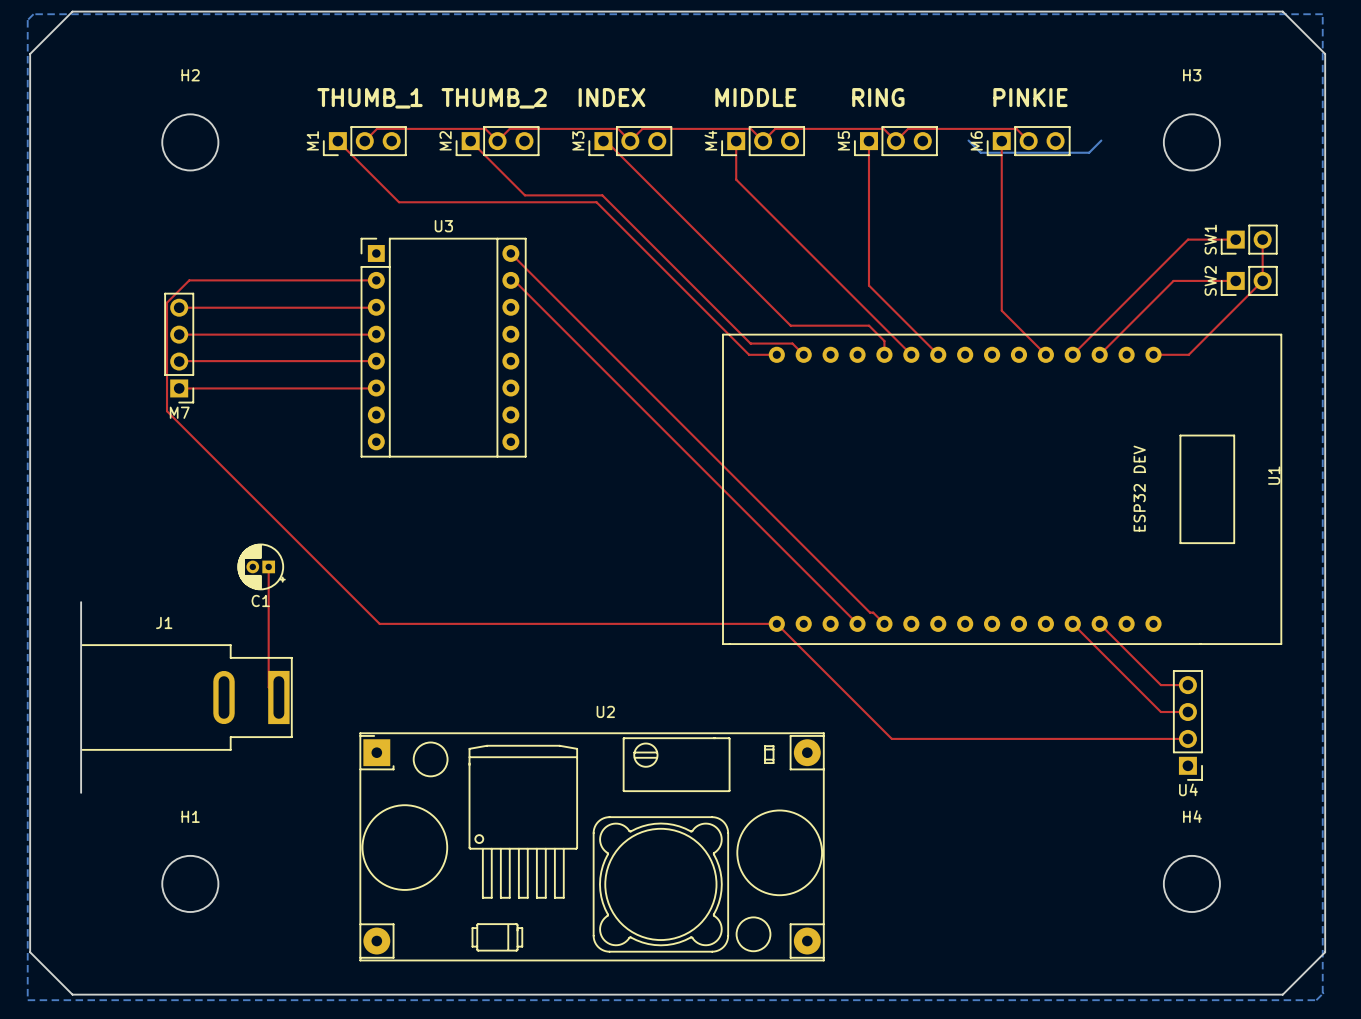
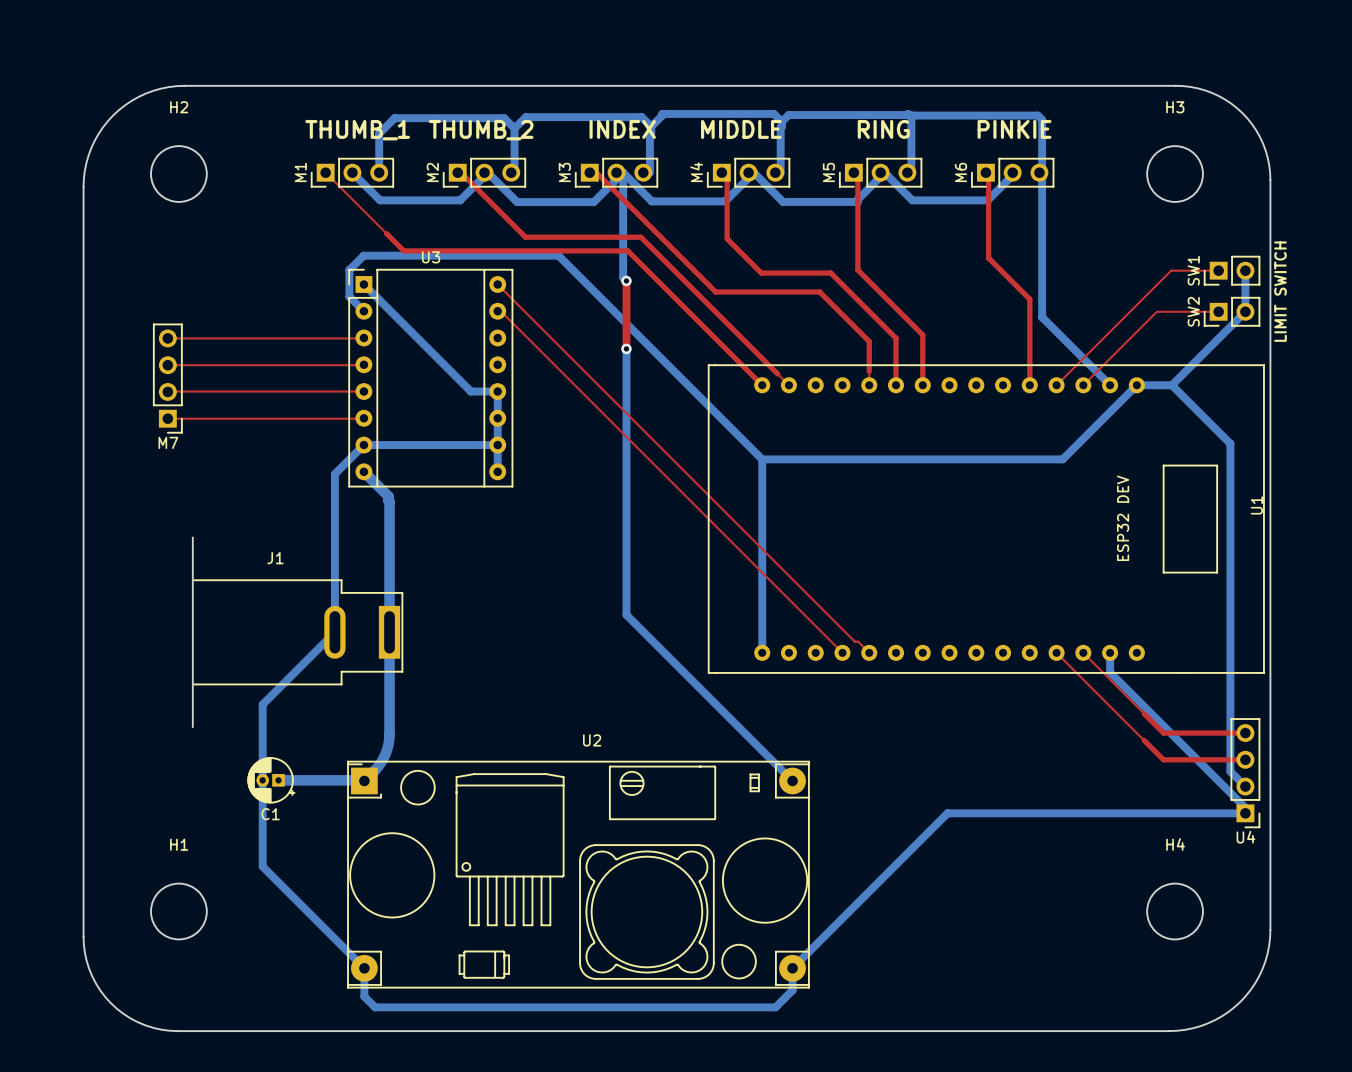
board edge: (72, 11) (1282, 11) (1325, 53) (1325, 952) (1282, 994) (72, 994) (30, 952) (30, 53) (72, 11) -> (1169, 1031) (1200, 1026) (1222, 1016) (1234, 1006) (1251, 989) (1259, 975) (1267, 953) (1270, 937) (1270, 172) (1265, 150) (1260, 137) (1252, 124) (1237, 108) (1218, 95) (1204, 90) (1175, 85) (184, 85) (161, 88) (138, 96) (125, 105) (107, 121) (98, 134) (88, 155) (83, 186) (83, 936) (86, 961) (92, 976) (105, 997) (117, 1009) (145, 1025) (177, 1031) (1169, 1031)
bottom track: none -> (911, 117) (908, 113) (788, 115) (781, 121)
bottom track: none -> (911, 117) (911, 172)
bottom track: none -> (911, 117) (912, 115) (1037, 115) (1042, 119) (1042, 317) (1110, 385)
bottom track: none -> (781, 121) (773, 113) (662, 113) (651, 126)
bottom track: none -> (781, 121) (780, 172)
bottom track: none -> (651, 126) (649, 172)
bottom track: none -> (651, 126) (641, 117) (525, 117) (514, 128) (514, 172)
bottom track: none -> (514, 128) (504, 118) (394, 118) (379, 133) (379, 172)
text position: INDEX (611, 97) -> INDEX (622, 129)
text position: RING (878, 97) -> RING (883, 129)
bottom track: (968, 140) (980, 152) (1089, 152) (1101, 140) -> none
top track: (364, 141) (376, 128) (485, 128) (497, 141) (509, 128) (618, 128) (630, 141) (642, 128) (750, 128) (763, 141) (775, 128) (883, 128) (895, 141) (908, 128) (1016, 128) (1028, 141) -> none
bottom track: none -> (352, 172) (380, 200) (460, 200) (487, 172) (517, 202) (593, 202) (623, 172)
top track: (470, 141) (524, 195) (602, 195) (750, 343) -> none
top track: (603, 141) (606, 141) (790, 325) (869, 325) (884, 341) -> (596, 172) (715, 292) (819, 292) (869, 341) (869, 371)
bottom track: none -> (623, 172) (623, 277) (626, 280)
bottom track: none -> (623, 172) (651, 201) (725, 201) (753, 172) (783, 201) (857, 201) (857, 199) (884, 172) (912, 200) (987, 200) (1015, 172)
top track: (736, 141) (736, 179) (911, 354) -> (727, 172) (727, 238) (761, 273) (830, 273) (896, 338) (896, 385)
top track: (868, 141) (868, 285) (938, 354) -> (857, 172) (857, 269) (922, 334) (922, 385)
top track: (1001, 141) (1001, 310) (1045, 354) -> (988, 172) (988, 258) (1029, 299) (1029, 385)
top track: (399, 202) (596, 202) (749, 354) (776, 354) -> (386, 233) (403, 250) (627, 250) (762, 385)
top track: (1262, 239) (1262, 280) (1188, 354) (1153, 354) -> none
bottom track: none -> (1245, 270) (1245, 311) (1171, 385)
top track: none -> (626, 280) (626, 348)
via: none -> (626, 280)
bottom track: none -> (363, 284) (470, 391) (497, 391) (497, 471)
text: none -> LIMIT SWITCH (1280, 291)
top track: (376, 280) (189, 280) (167, 302) (167, 411) (379, 623) (776, 623) (891, 738) (1187, 738) -> none
bottom track: none -> (363, 311) (349, 296) (349, 270) (363, 255) (558, 255) (762, 459)
bottom track: none -> (626, 348) (626, 614) (792, 780)
via: none -> (626, 348)
top track: (750, 343) (792, 343) -> (461, 172) (525, 237) (640, 237) (777, 374)
bottom track: none -> (1171, 385) (1136, 385) (1062, 459) (762, 459)
bottom track: none -> (1171, 385) (1230, 443) (1230, 771) (1245, 786)
bottom track: none -> (497, 445) (363, 445) (334, 474) (334, 632) (262, 704) (262, 866) (364, 968) (364, 996) (375, 1007) (775, 1007) (792, 990) (792, 968) (947, 813) (1245, 813) (1245, 807) (1110, 672) (1110, 652)
bottom track: none -> (762, 459) (762, 652)
bottom track: none -> (363, 471) (388, 496) (389, 501) (389, 739) (383, 758) (364, 780)
C1 position: (261, 566) -> (271, 780)
top track: (268, 566) (268, 687) (278, 697) -> none
top track: (1160, 685) (1187, 685) -> (1144, 713) (1163, 733) (1245, 733)
J1 position: (186, 697) -> (297, 632)
top track: (1160, 712) (1187, 712) -> (1144, 740) (1163, 759) (1245, 759)
U4 position: (1187, 725) -> (1245, 773)
bottom track: none -> (278, 780) (364, 780)
bottom zone outline: (1323, 992) (1316, 1000) (27, 1000) (27, 20) (33, 14) (1322, 14) (1322, 993) (1323, 993) -> none

